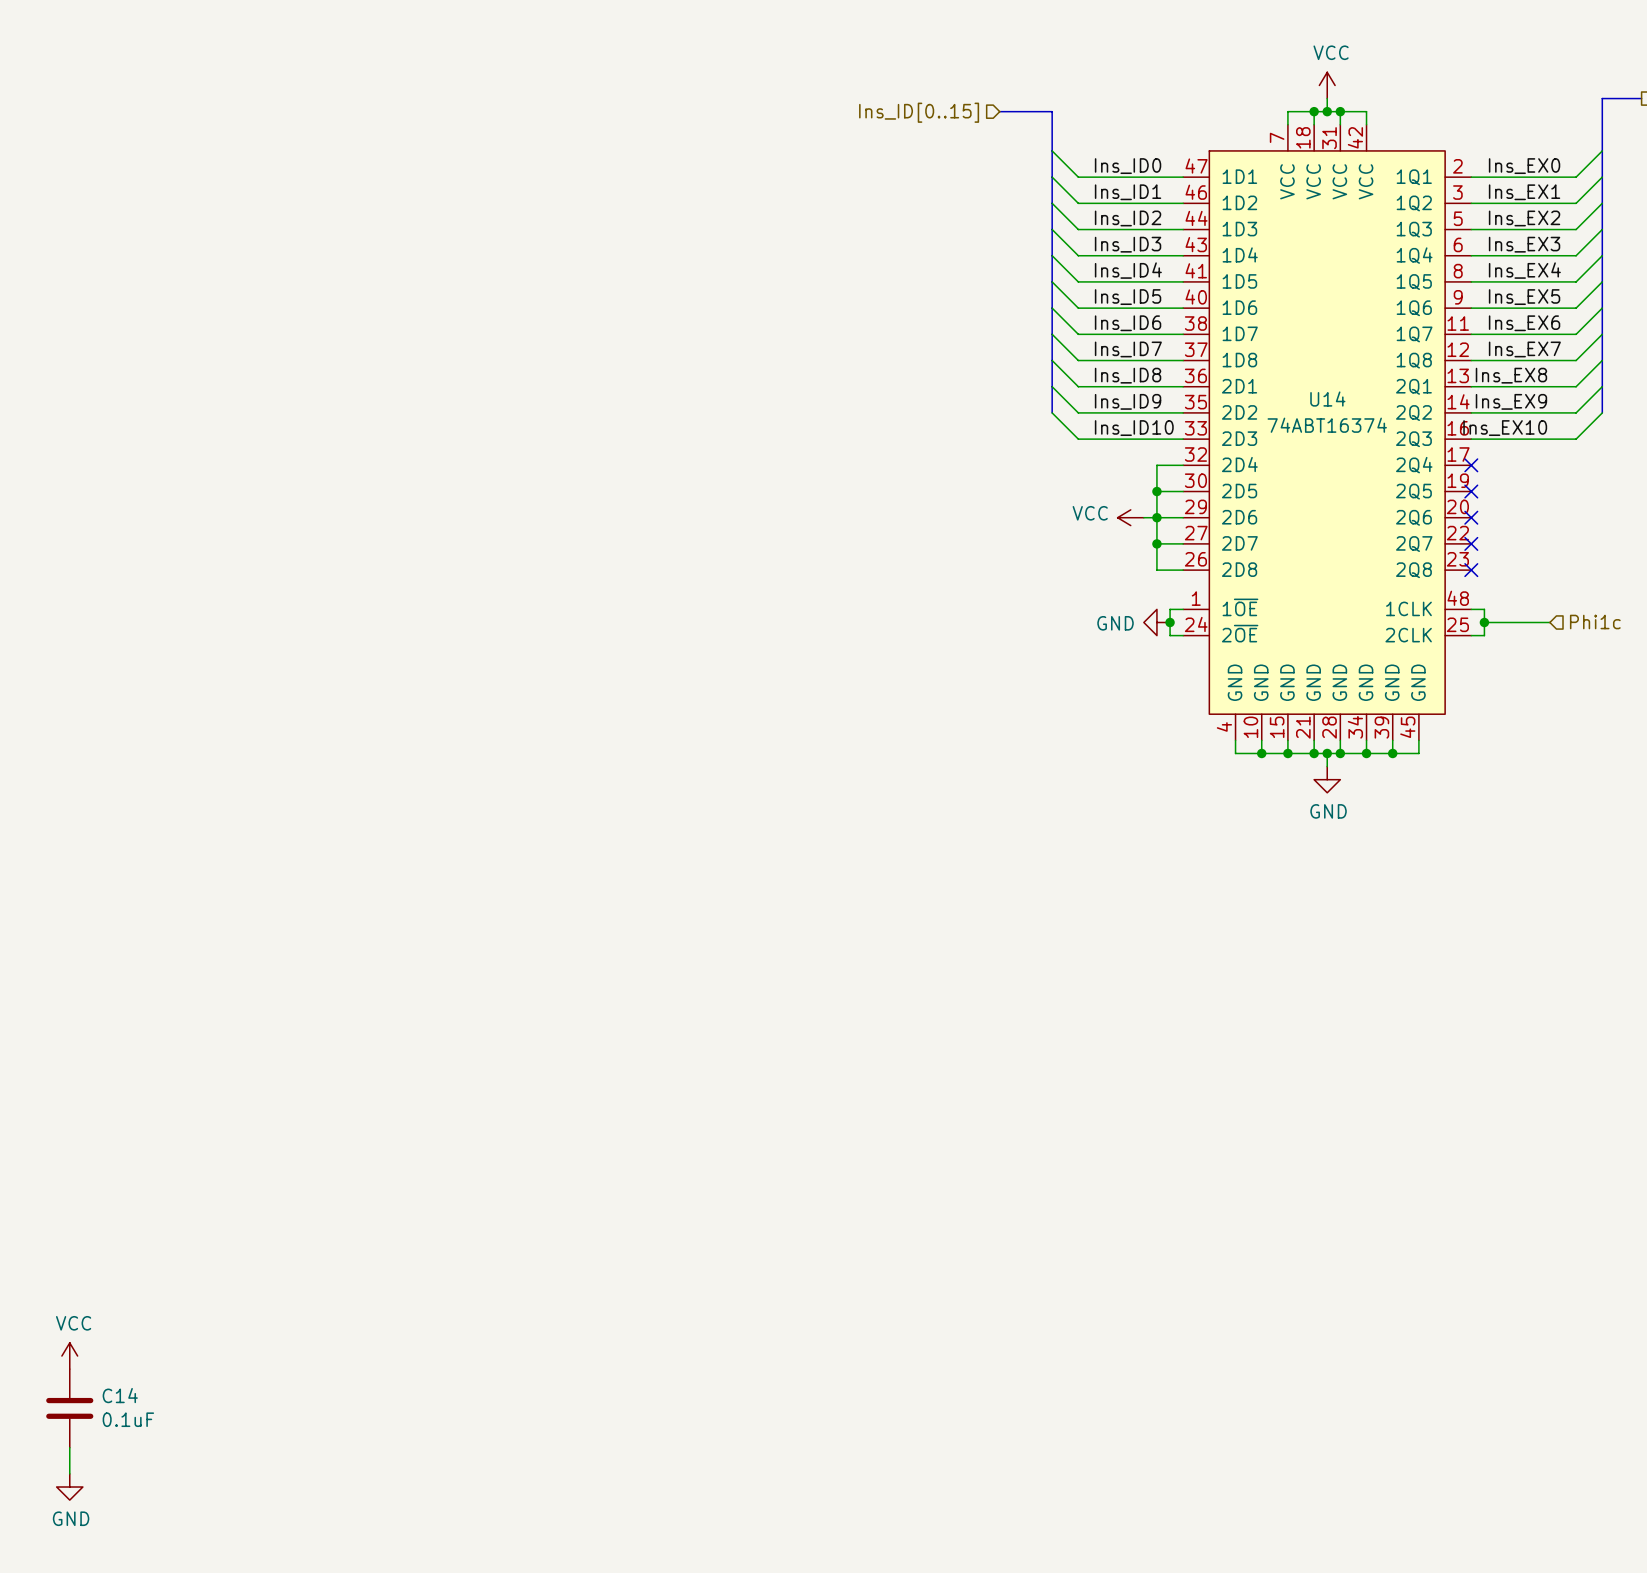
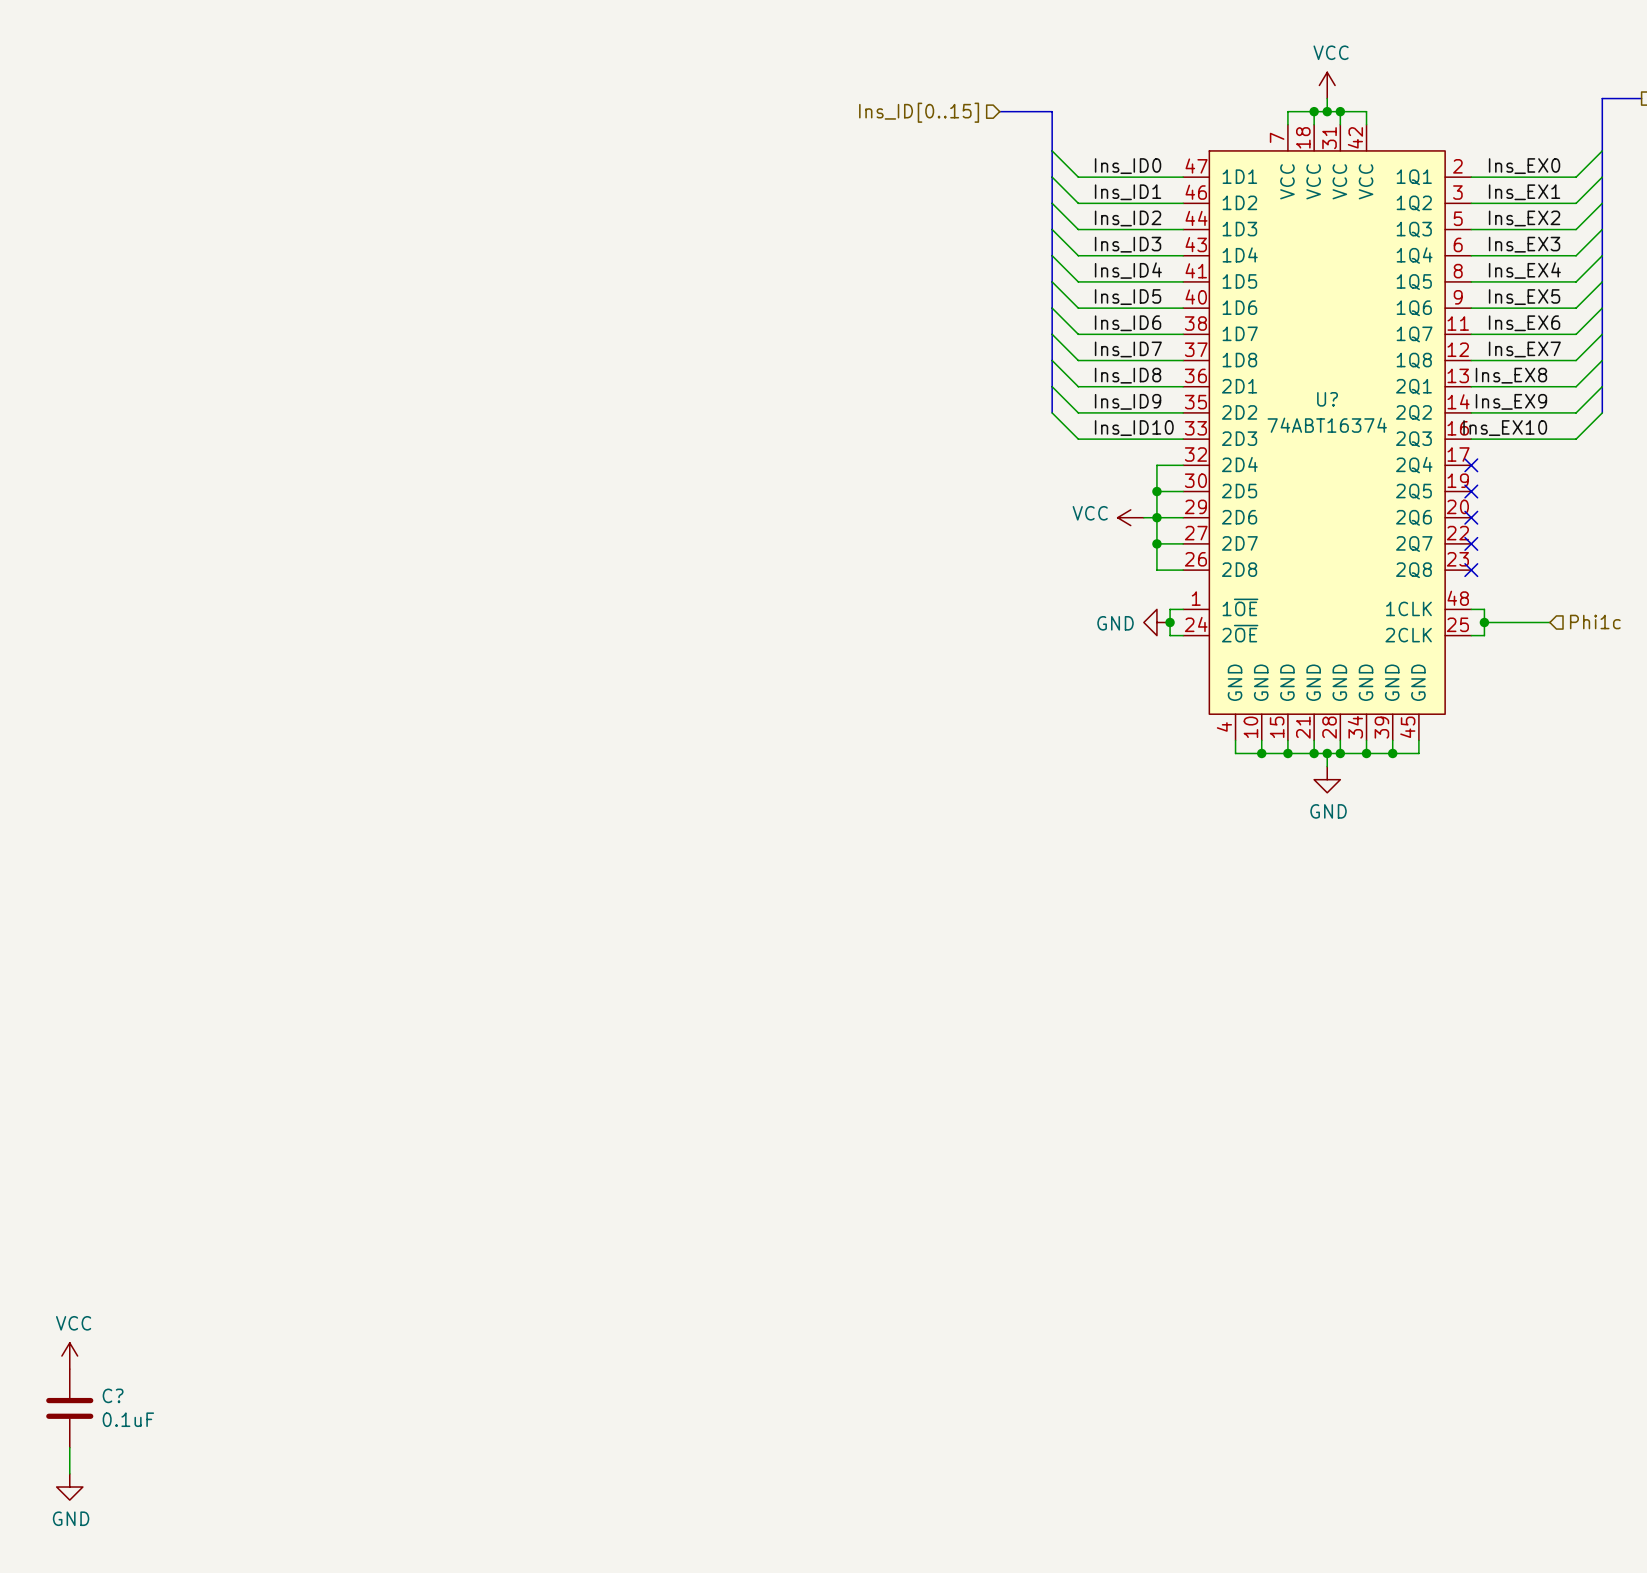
U14 name: U14 (1327, 399) -> U? (1327, 399)
C14 name: C14 (120, 1395) -> C? (113, 1395)

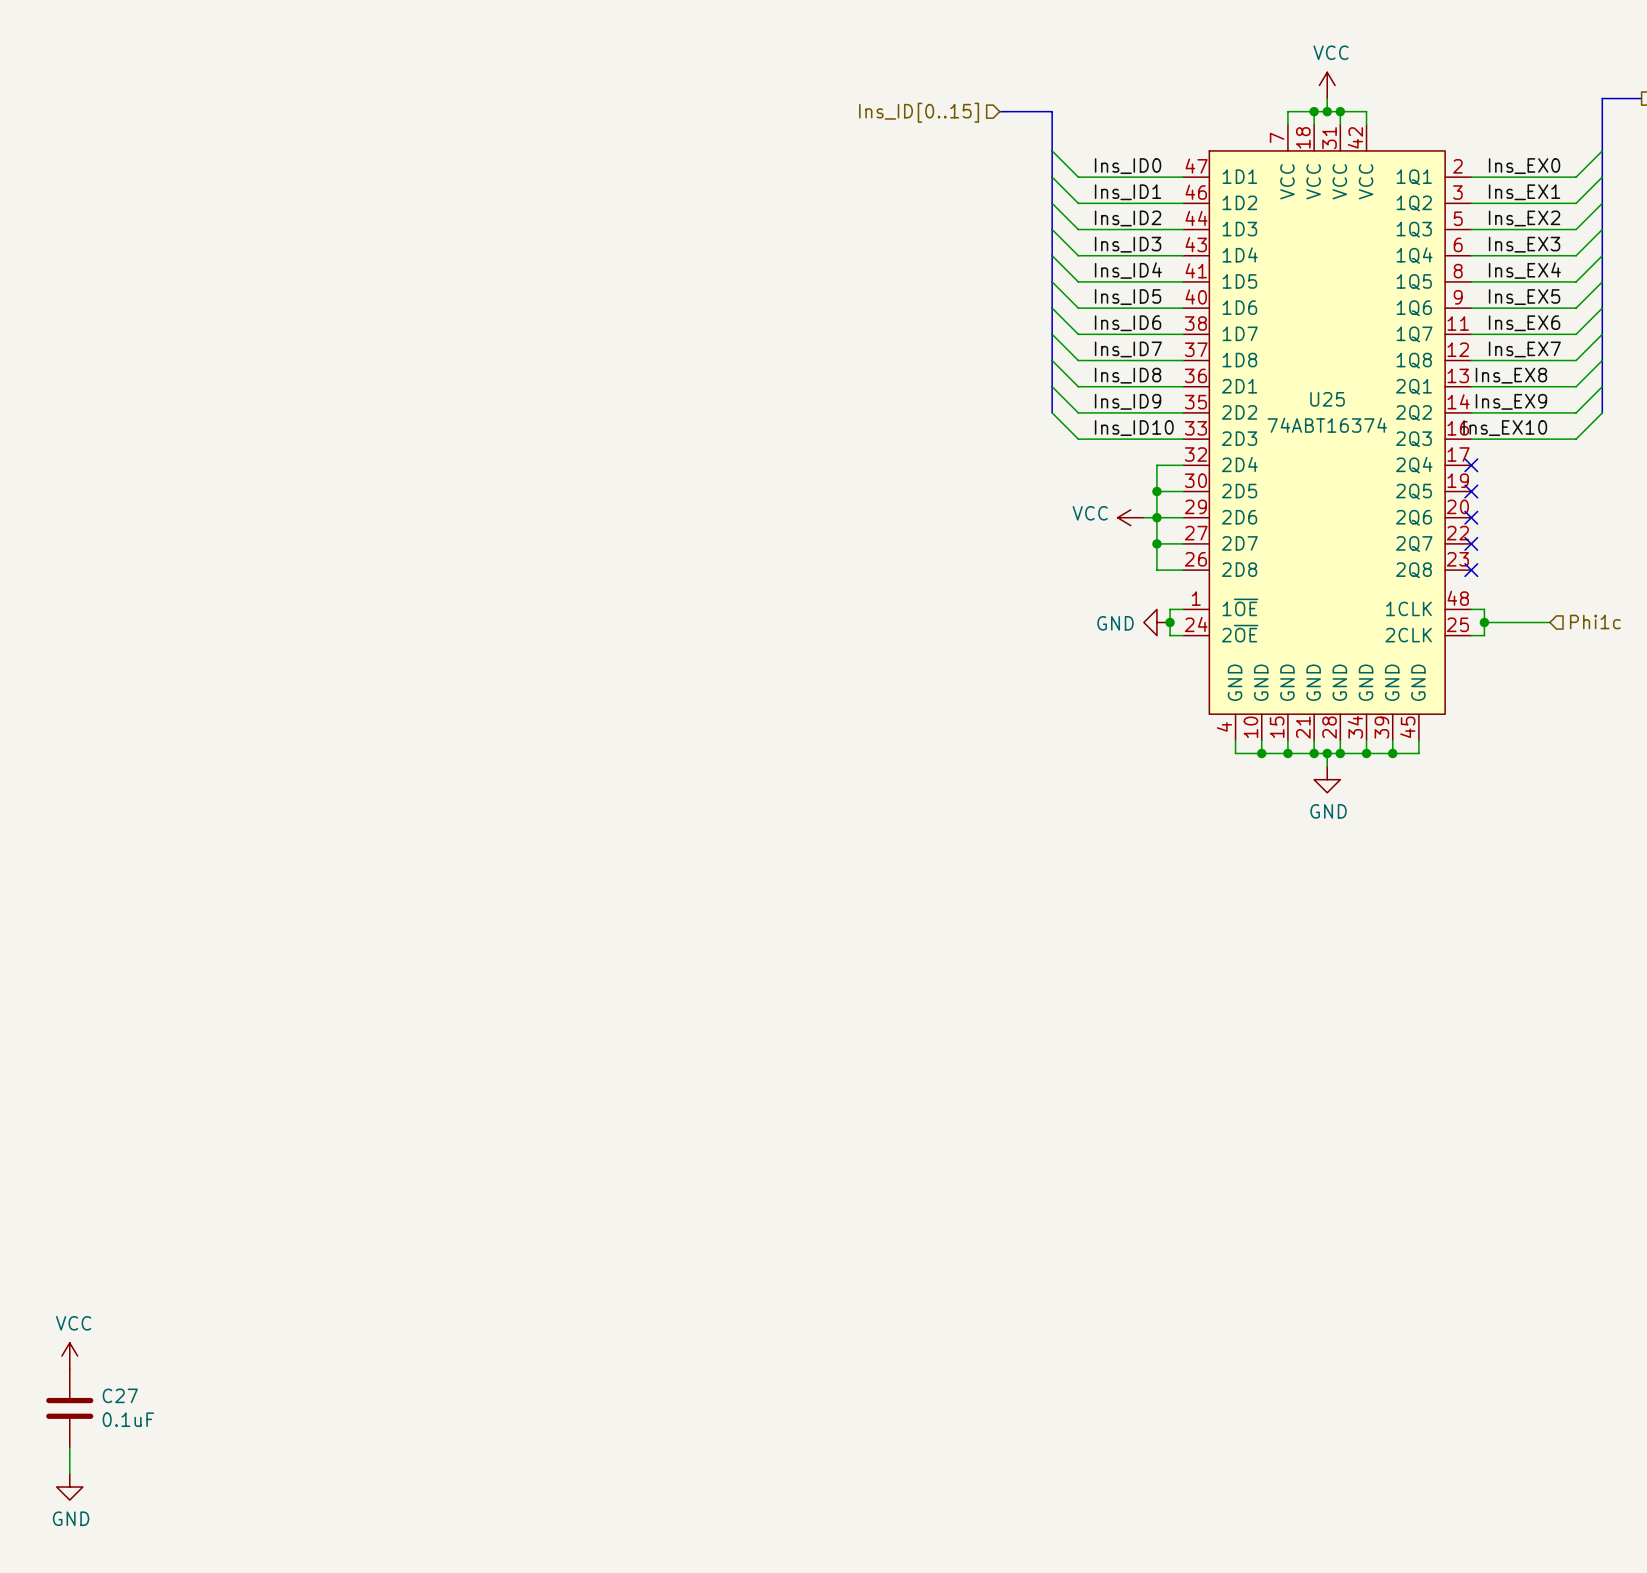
U? name: U? (1327, 399) -> U25 (1327, 399)
C? name: C? (113, 1395) -> C27 (120, 1395)

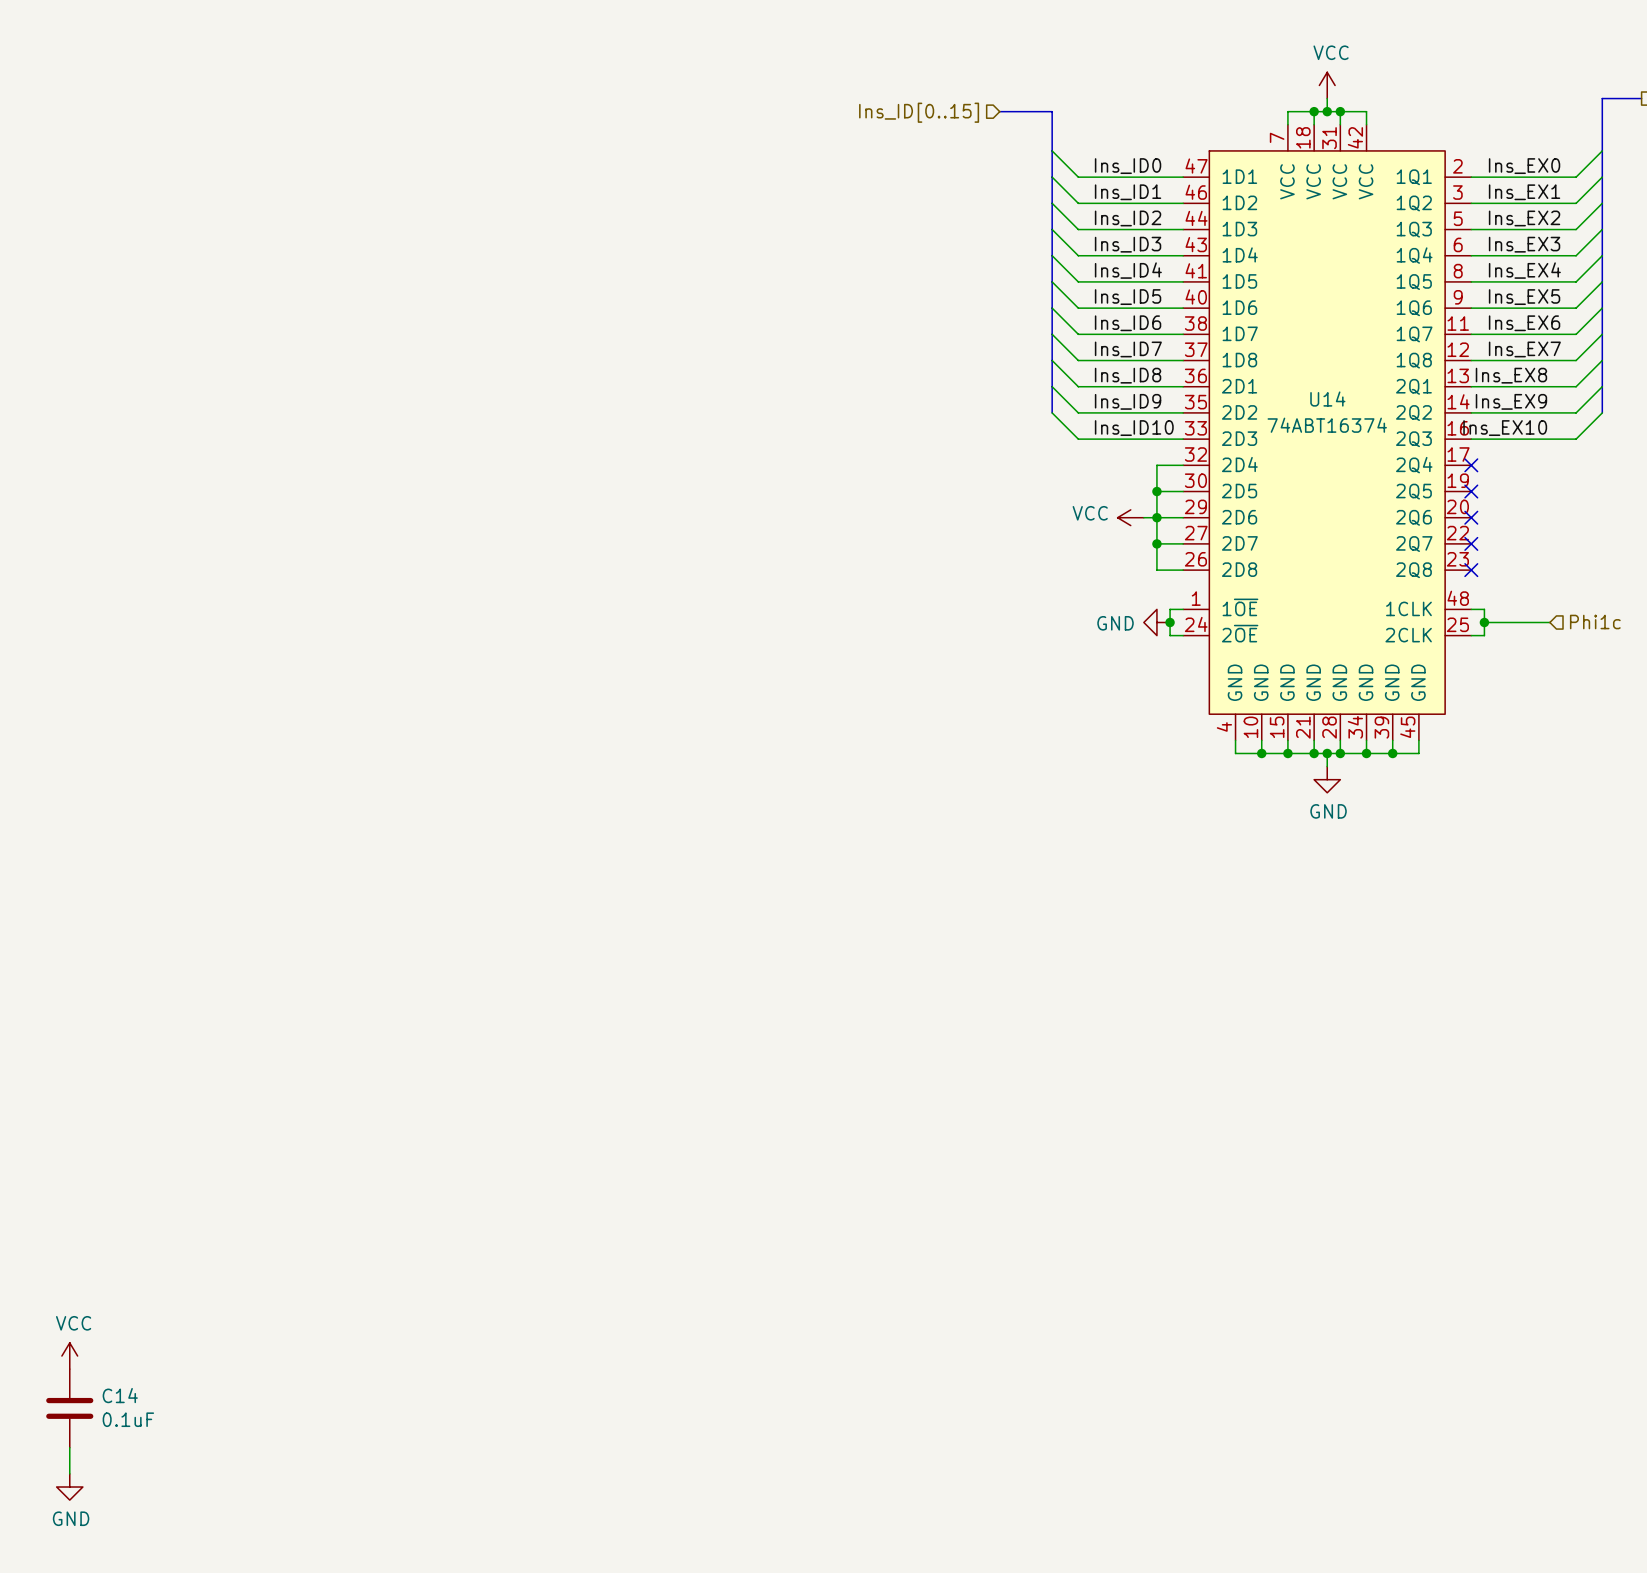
U25 name: U25 (1327, 399) -> U14 (1327, 399)
C27 name: C27 (120, 1395) -> C14 (120, 1395)

